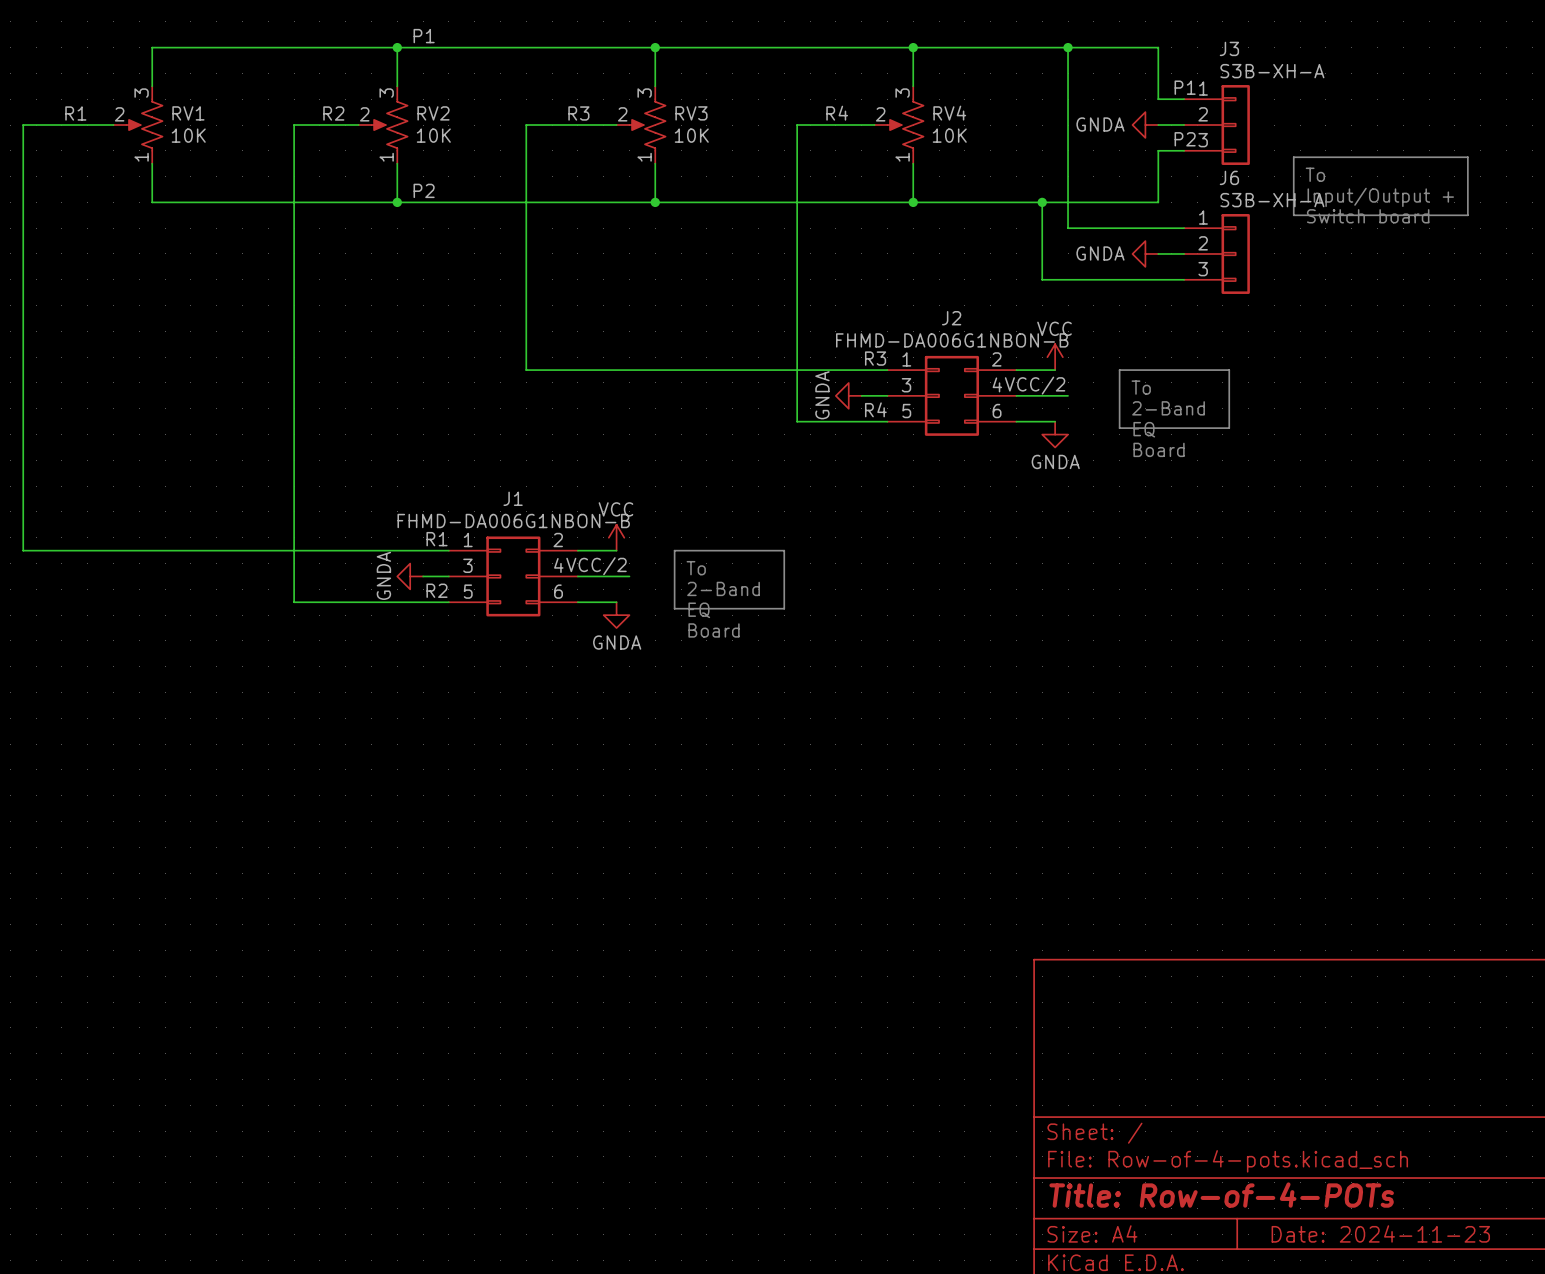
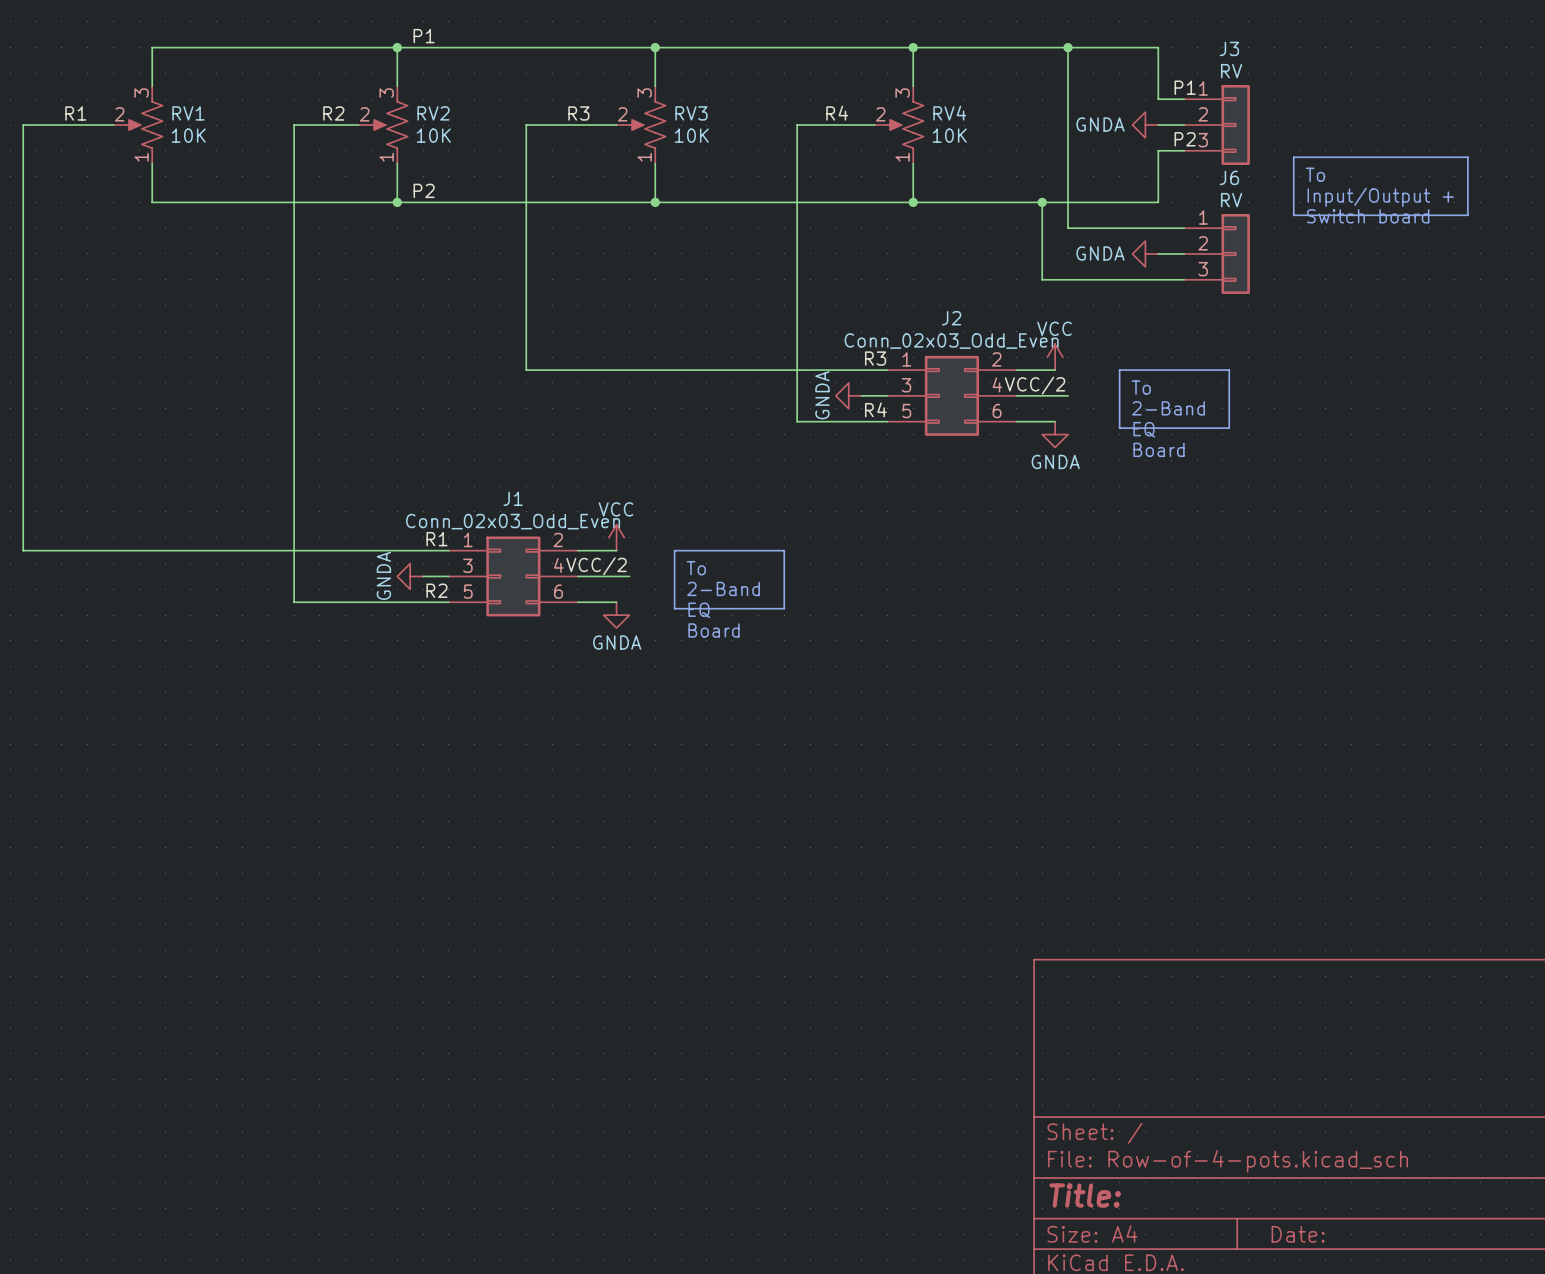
J3 value: S3B-XH-A (1272, 71) -> RV (1231, 71)
J6 value: S3B-XH-A (1272, 200) -> RV (1231, 200)
J2 value: FHMD-DA006G1NBON-B (952, 340) -> Conn_02x03_Odd_Even (951, 341)
J1 value: FHMD-DA006G1NBON-B (513, 521) -> Conn_02x03_Odd_Even (513, 521)
title block: Title: Row-of-4-POTs (1221, 1195) -> Title: (1085, 1195)
title block: Date: 2024-11-23 (1380, 1233) -> Date: (1298, 1234)

